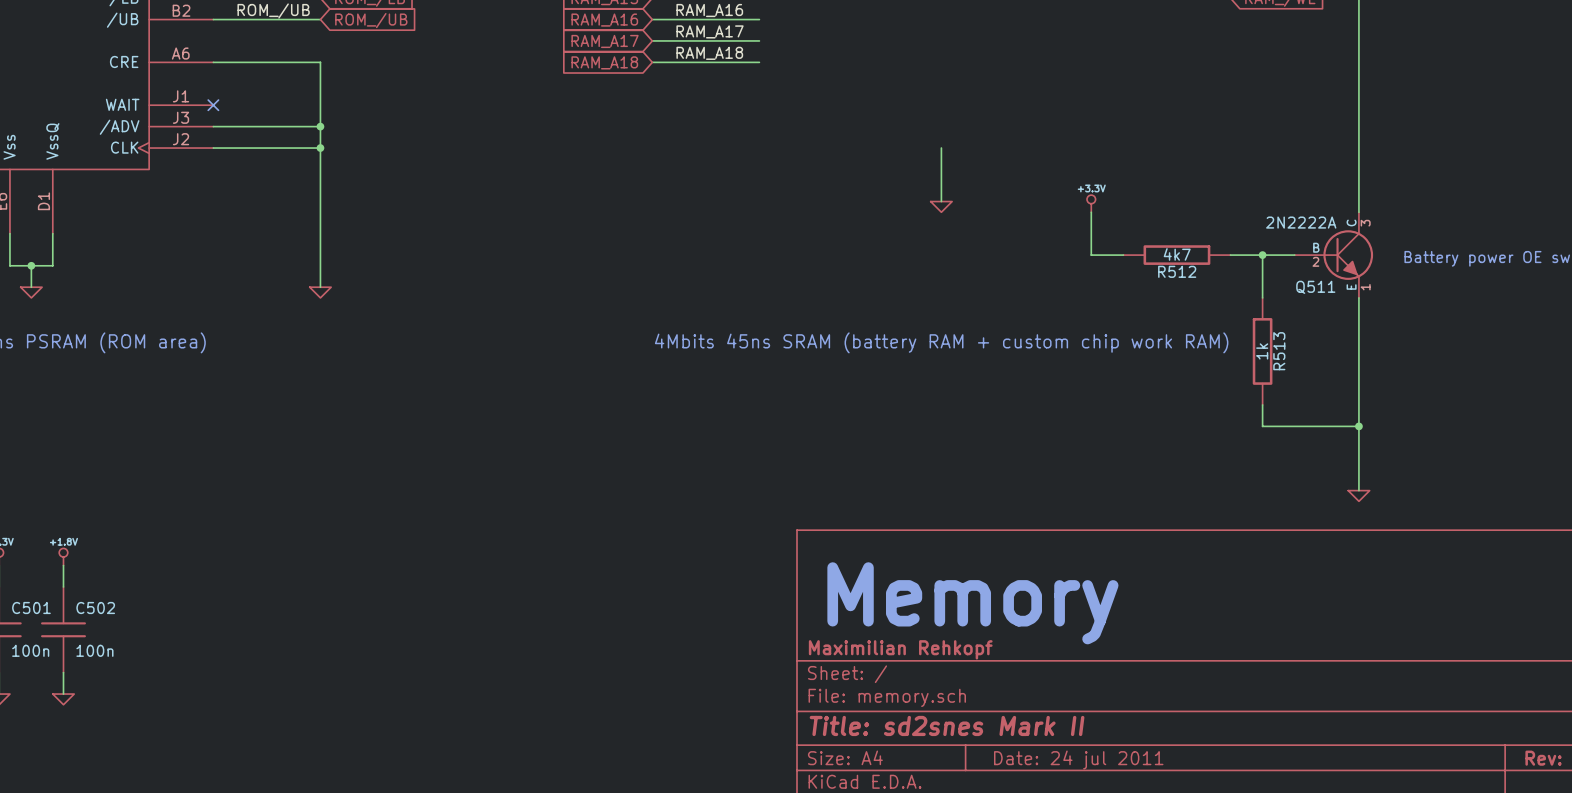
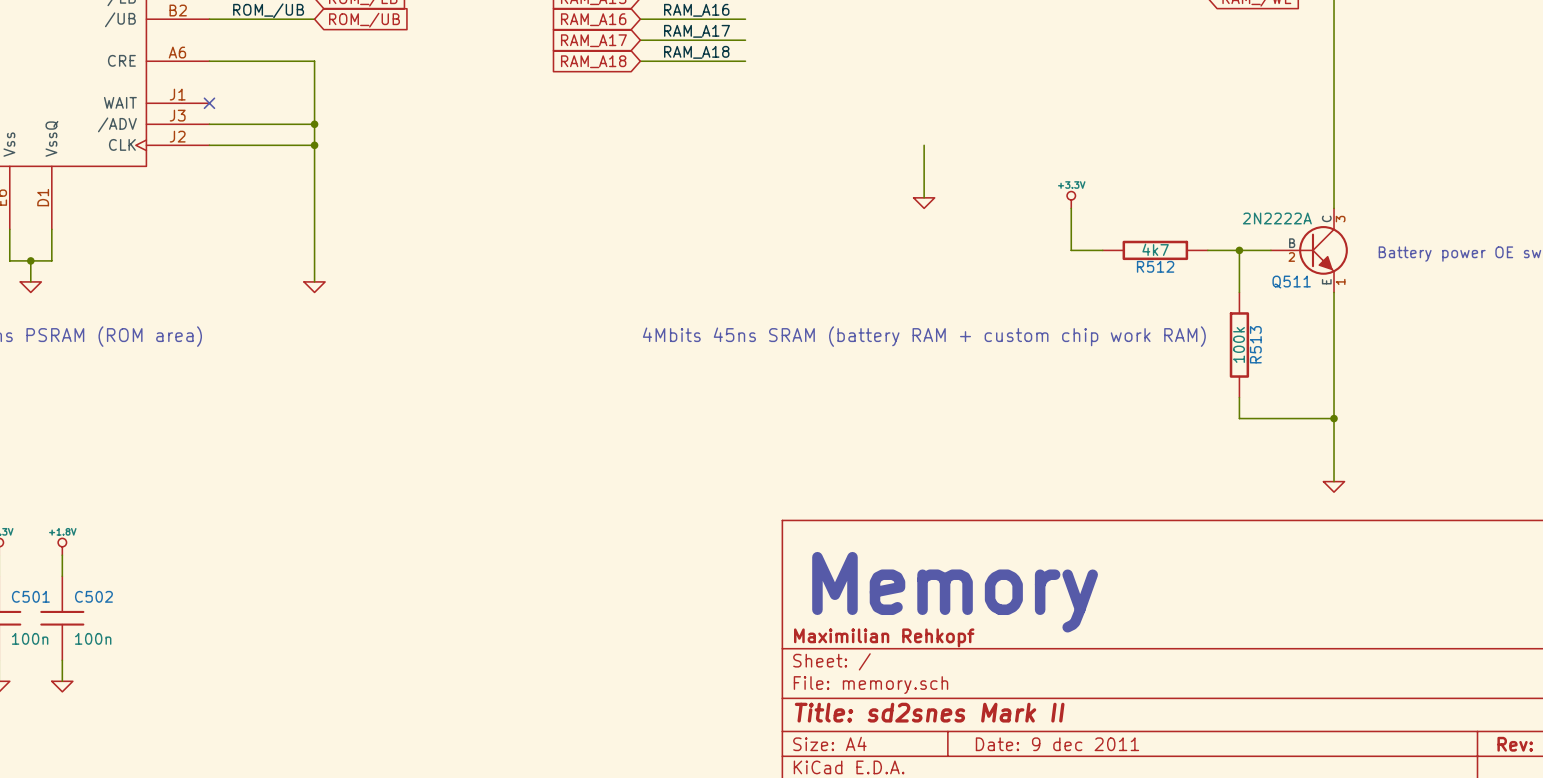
R513 value: 1k (1262, 351) -> 100k (1239, 344)
title block: Date: 24 jul 2011 (1078, 759) -> Date: 9 dec 2011 (1057, 744)

